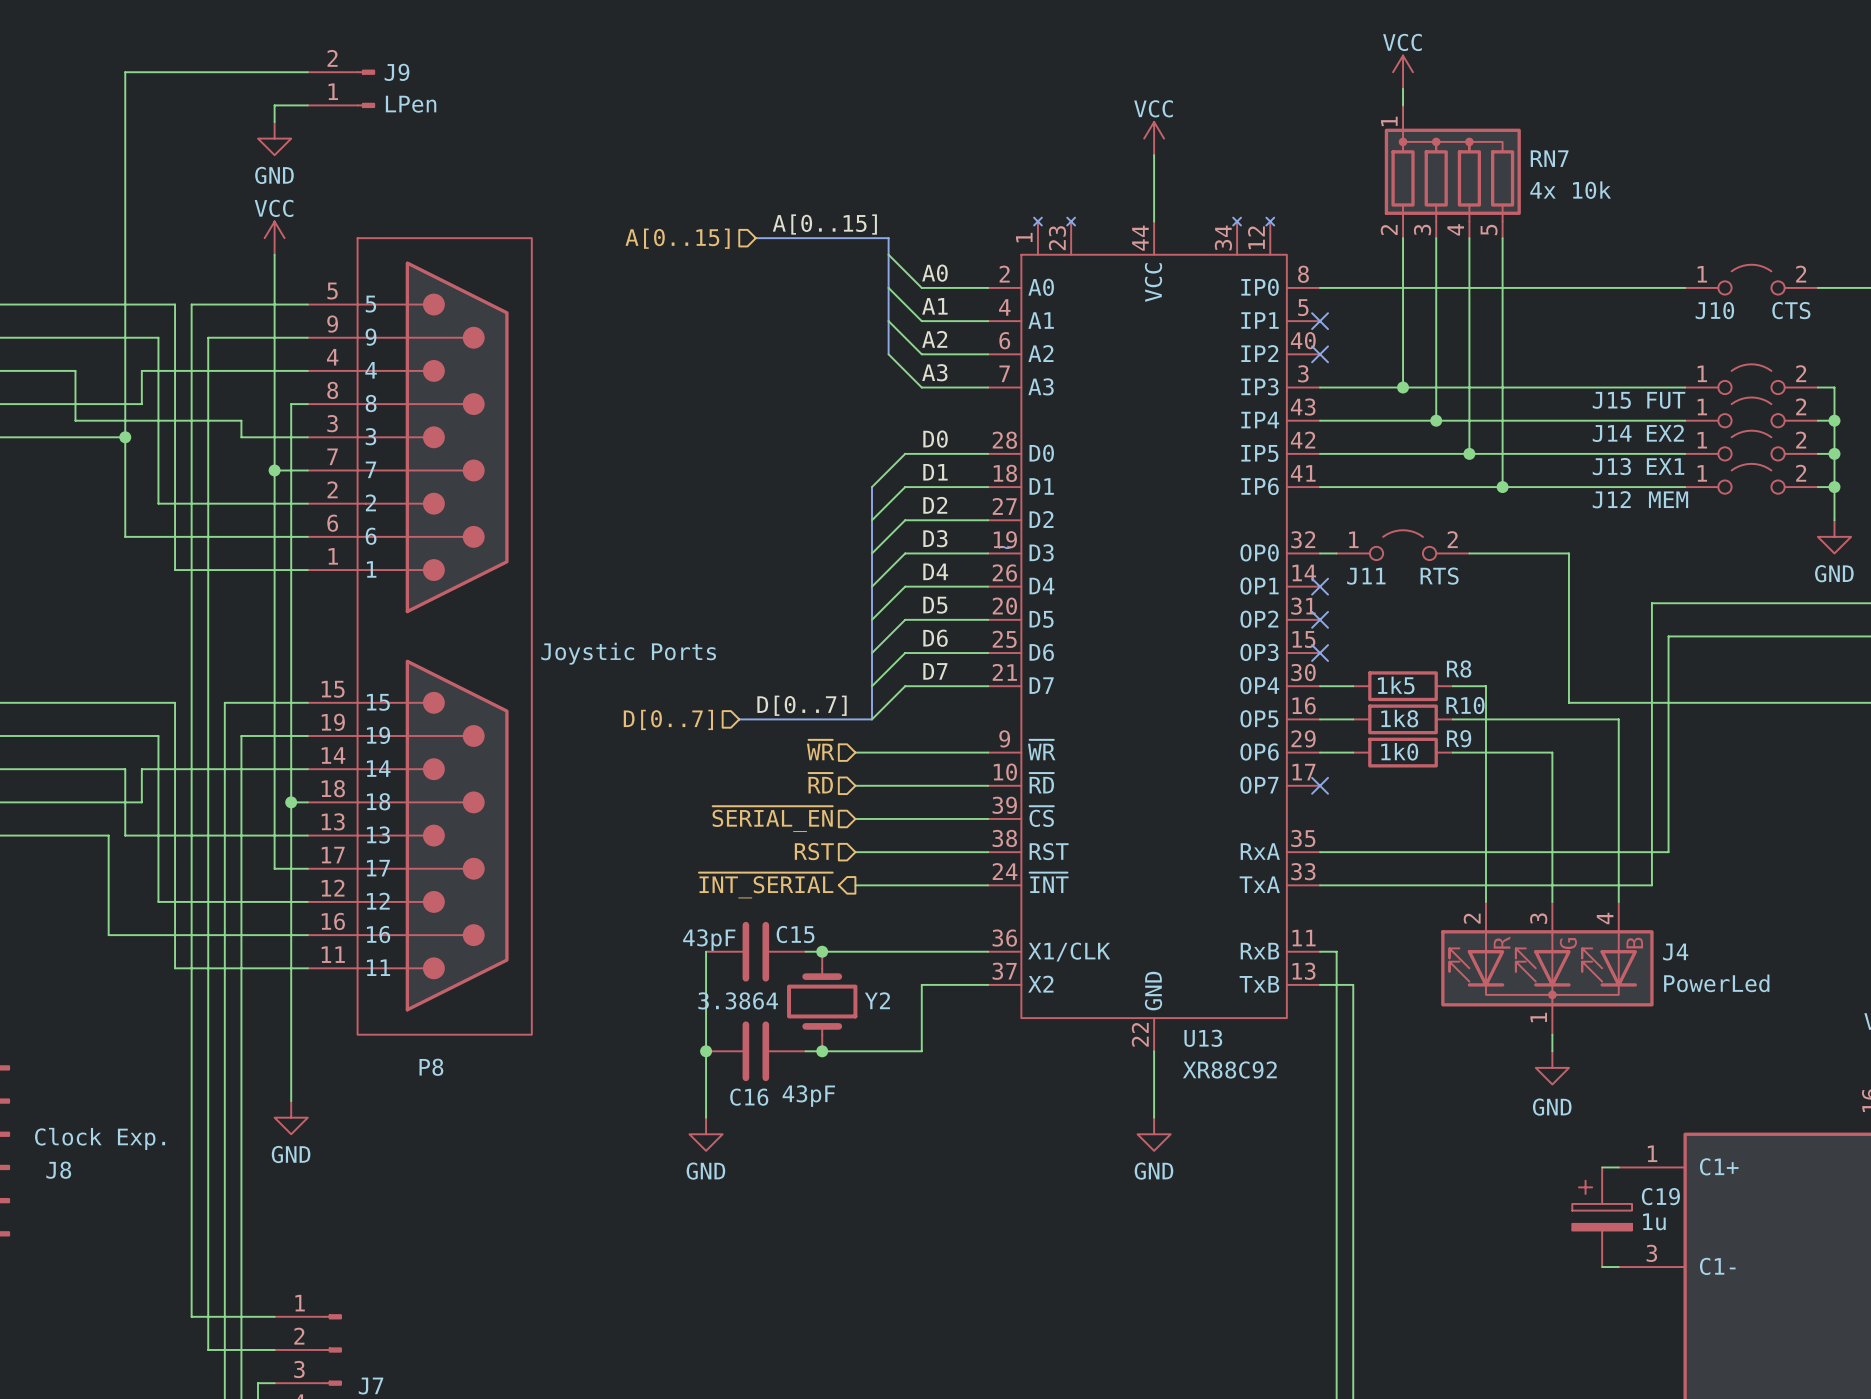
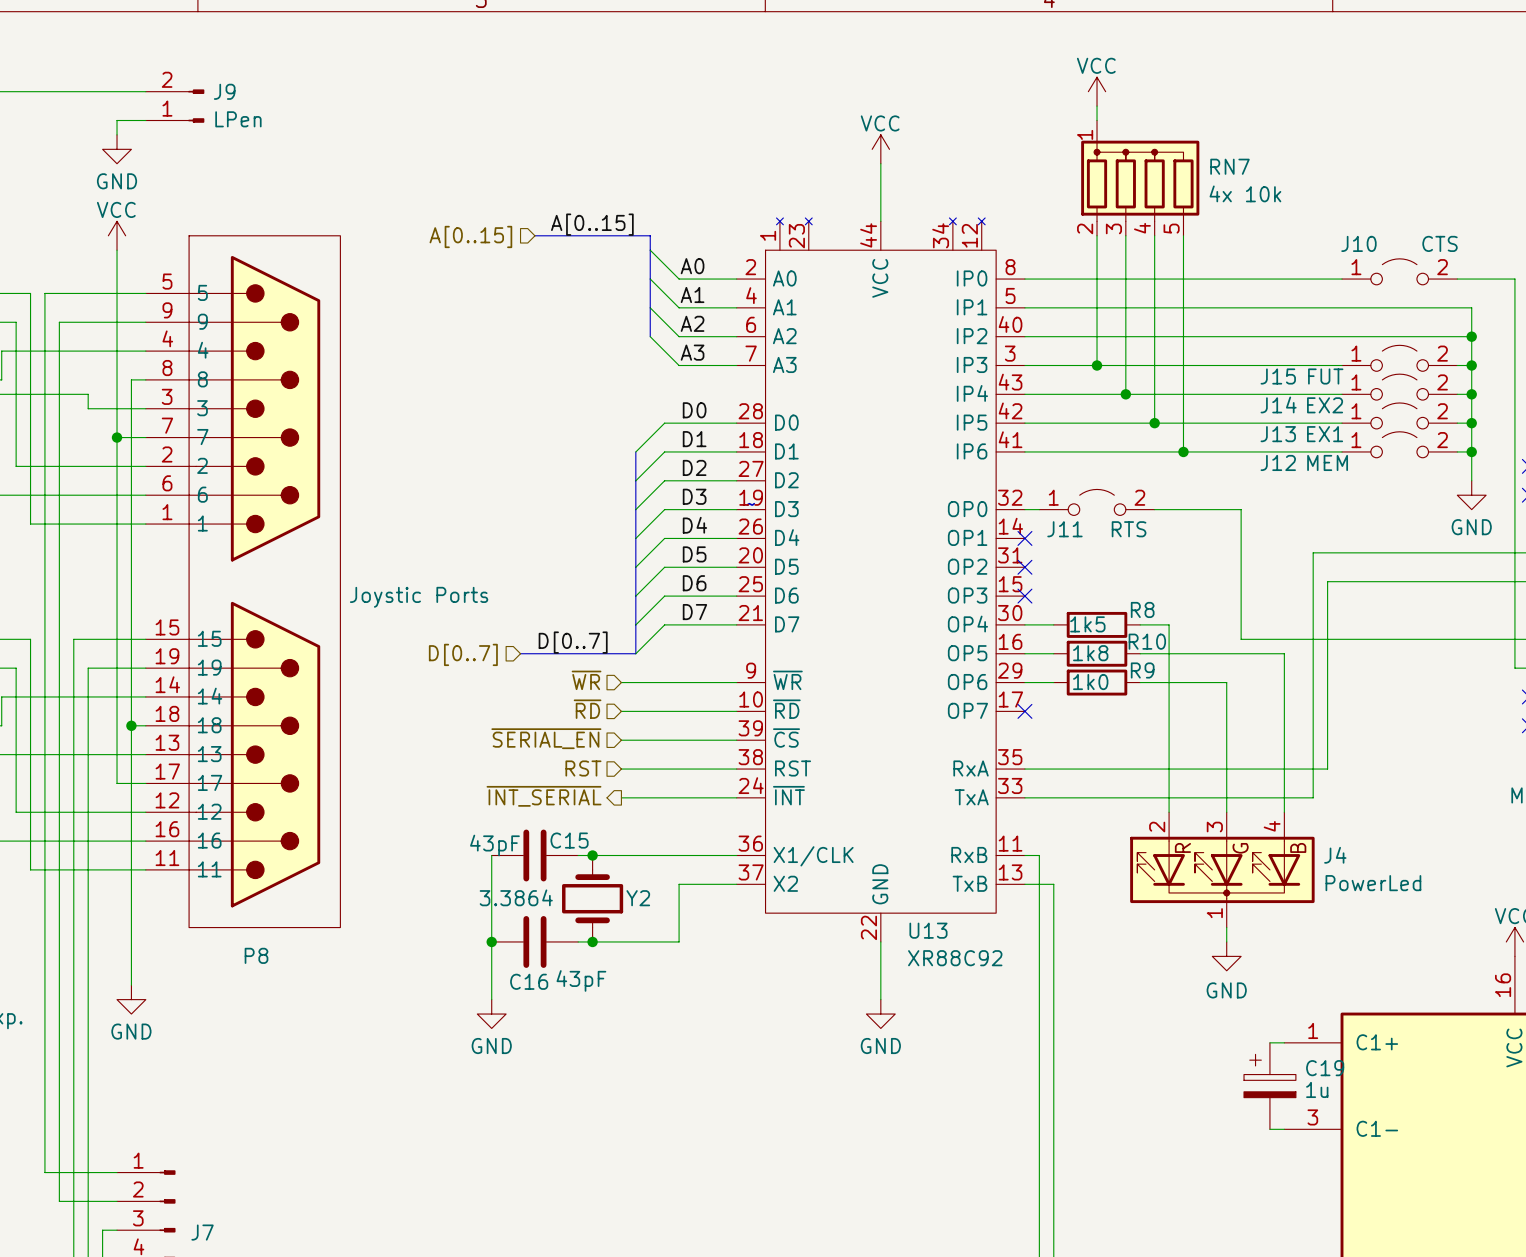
J10 name position: J10 (1714, 310) -> J10 (1358, 243)
J10 value position: CTS (1791, 310) -> CTS (1440, 243)
wire: none -> (1024, 307) (1471, 307) (1471, 365)
no-connect mark: (1320, 321) -> none
wire: none -> (1024, 336) (1471, 336)
no-connect mark: (1320, 354) -> none
junction: none -> (1471, 336)
junction: none -> (1471, 365)

